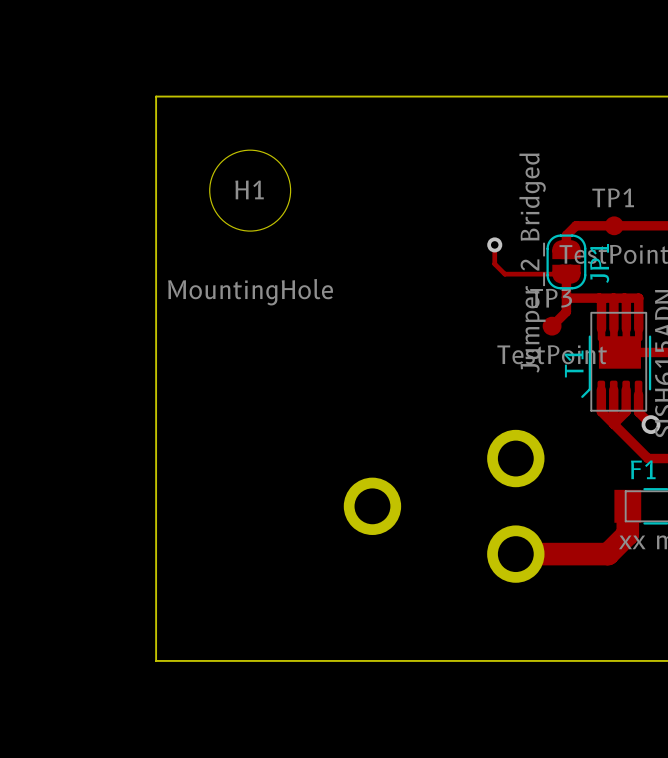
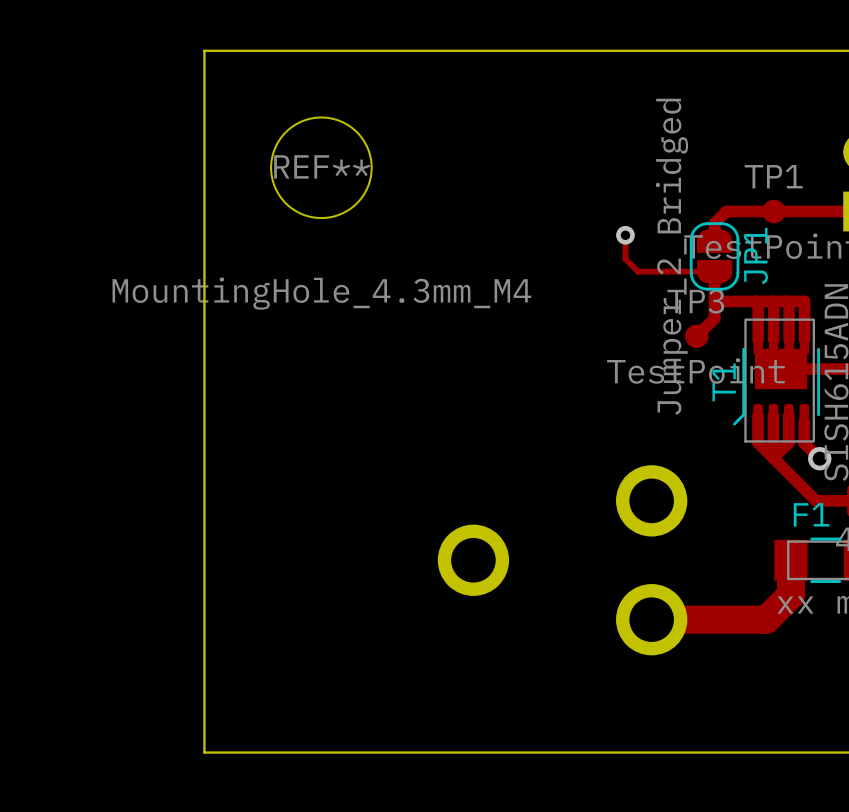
H1 name: H1 (249, 189) -> REF** (322, 166)
H1 value: MountingHole (250, 292) -> MountingHole_4.3mm_M4 (321, 293)

